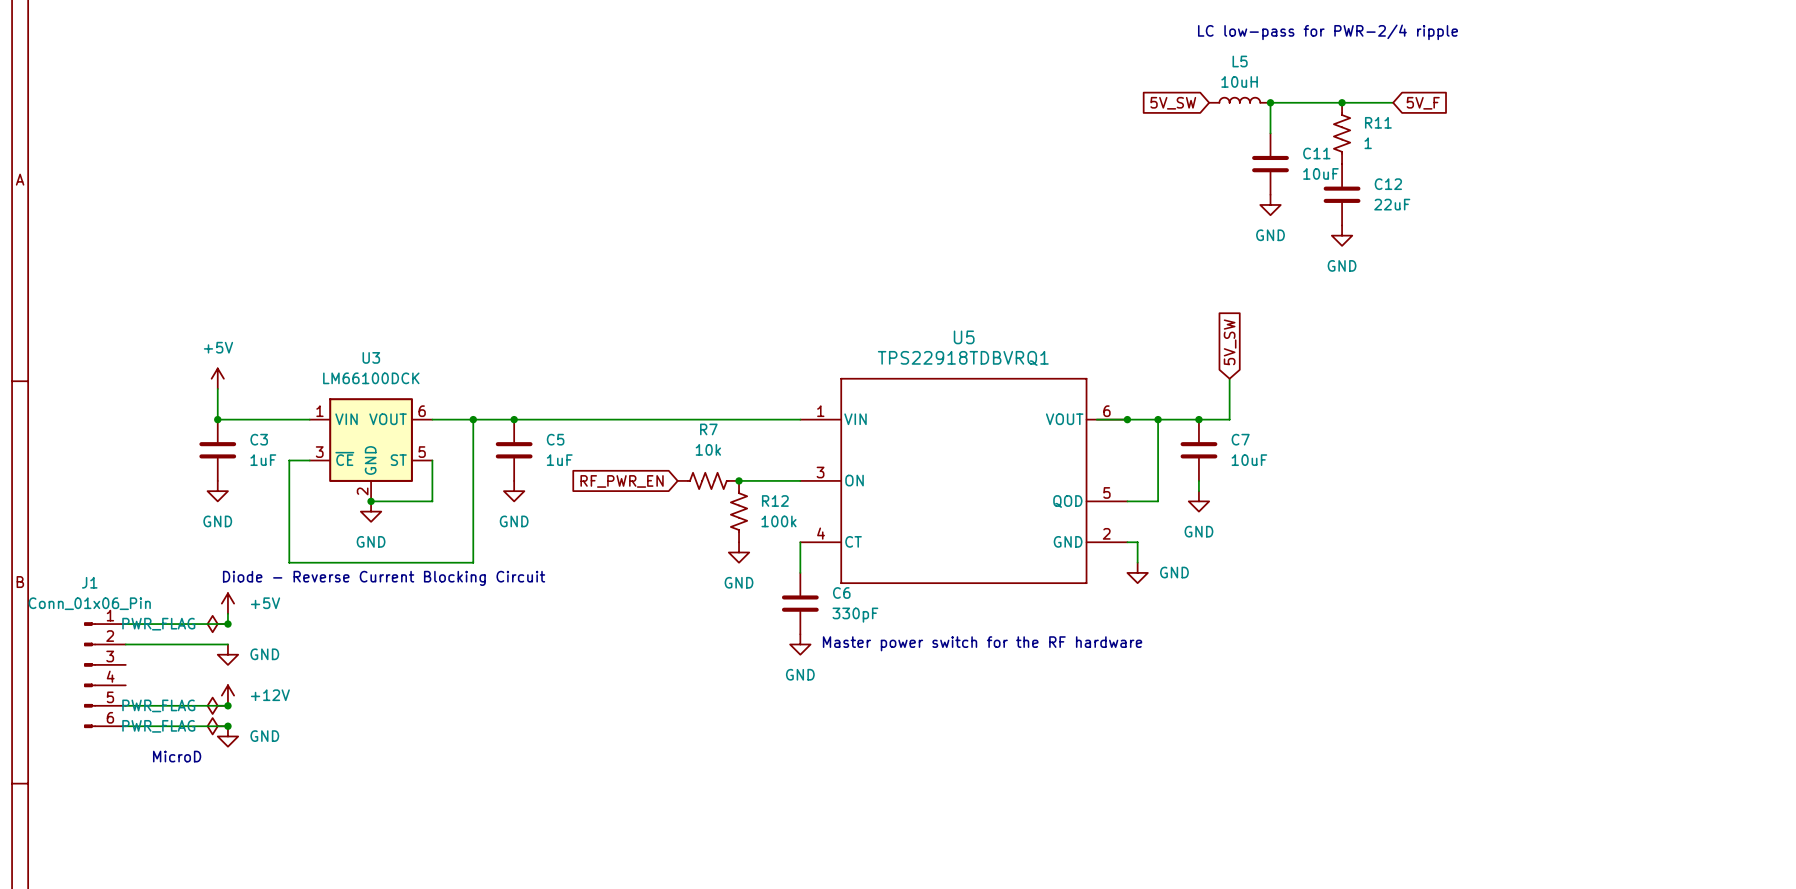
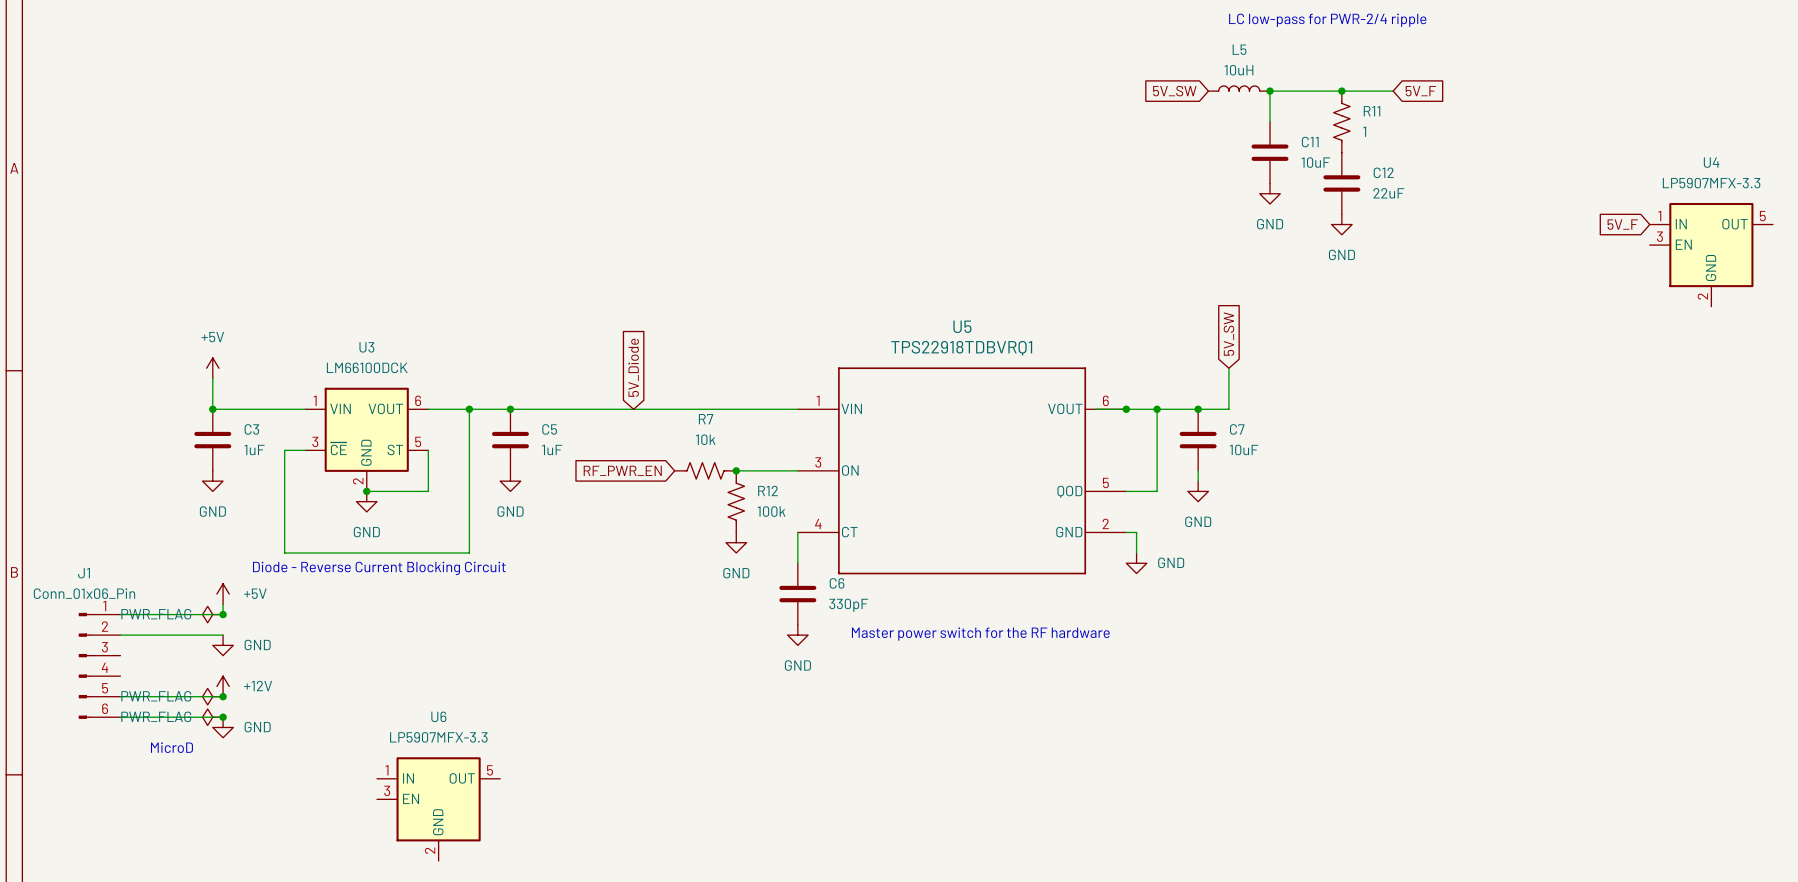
global label: none -> 5V_F (1622, 224)
U4: none -> LP5907MFX-3.3 (1711, 254)
global label: none -> 5V_Diode (633, 367)
U6: none -> LP5907MFX-3.3 (438, 809)

